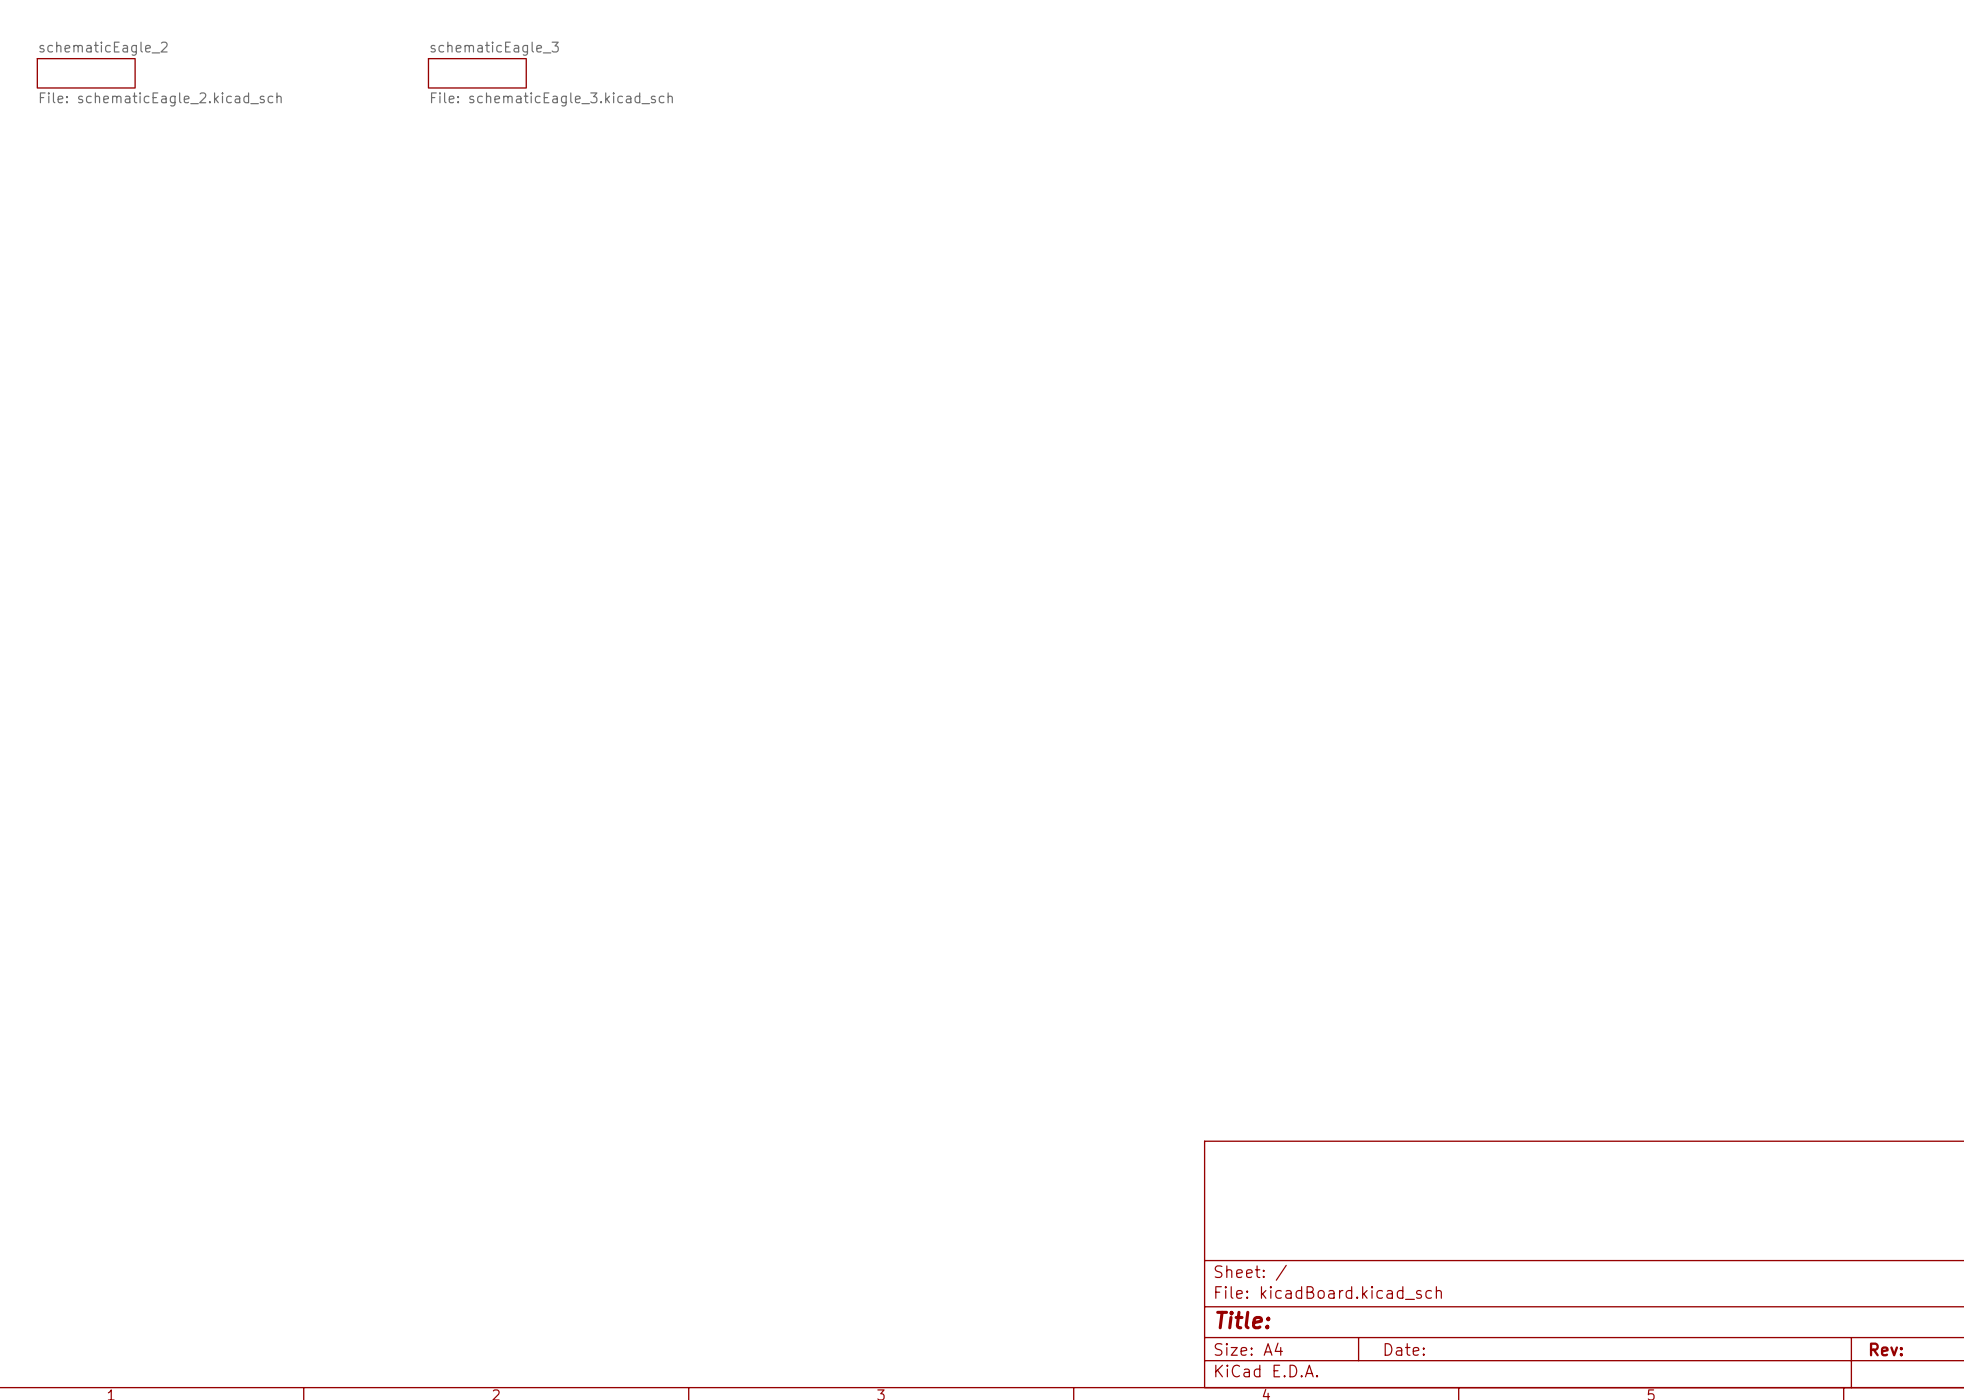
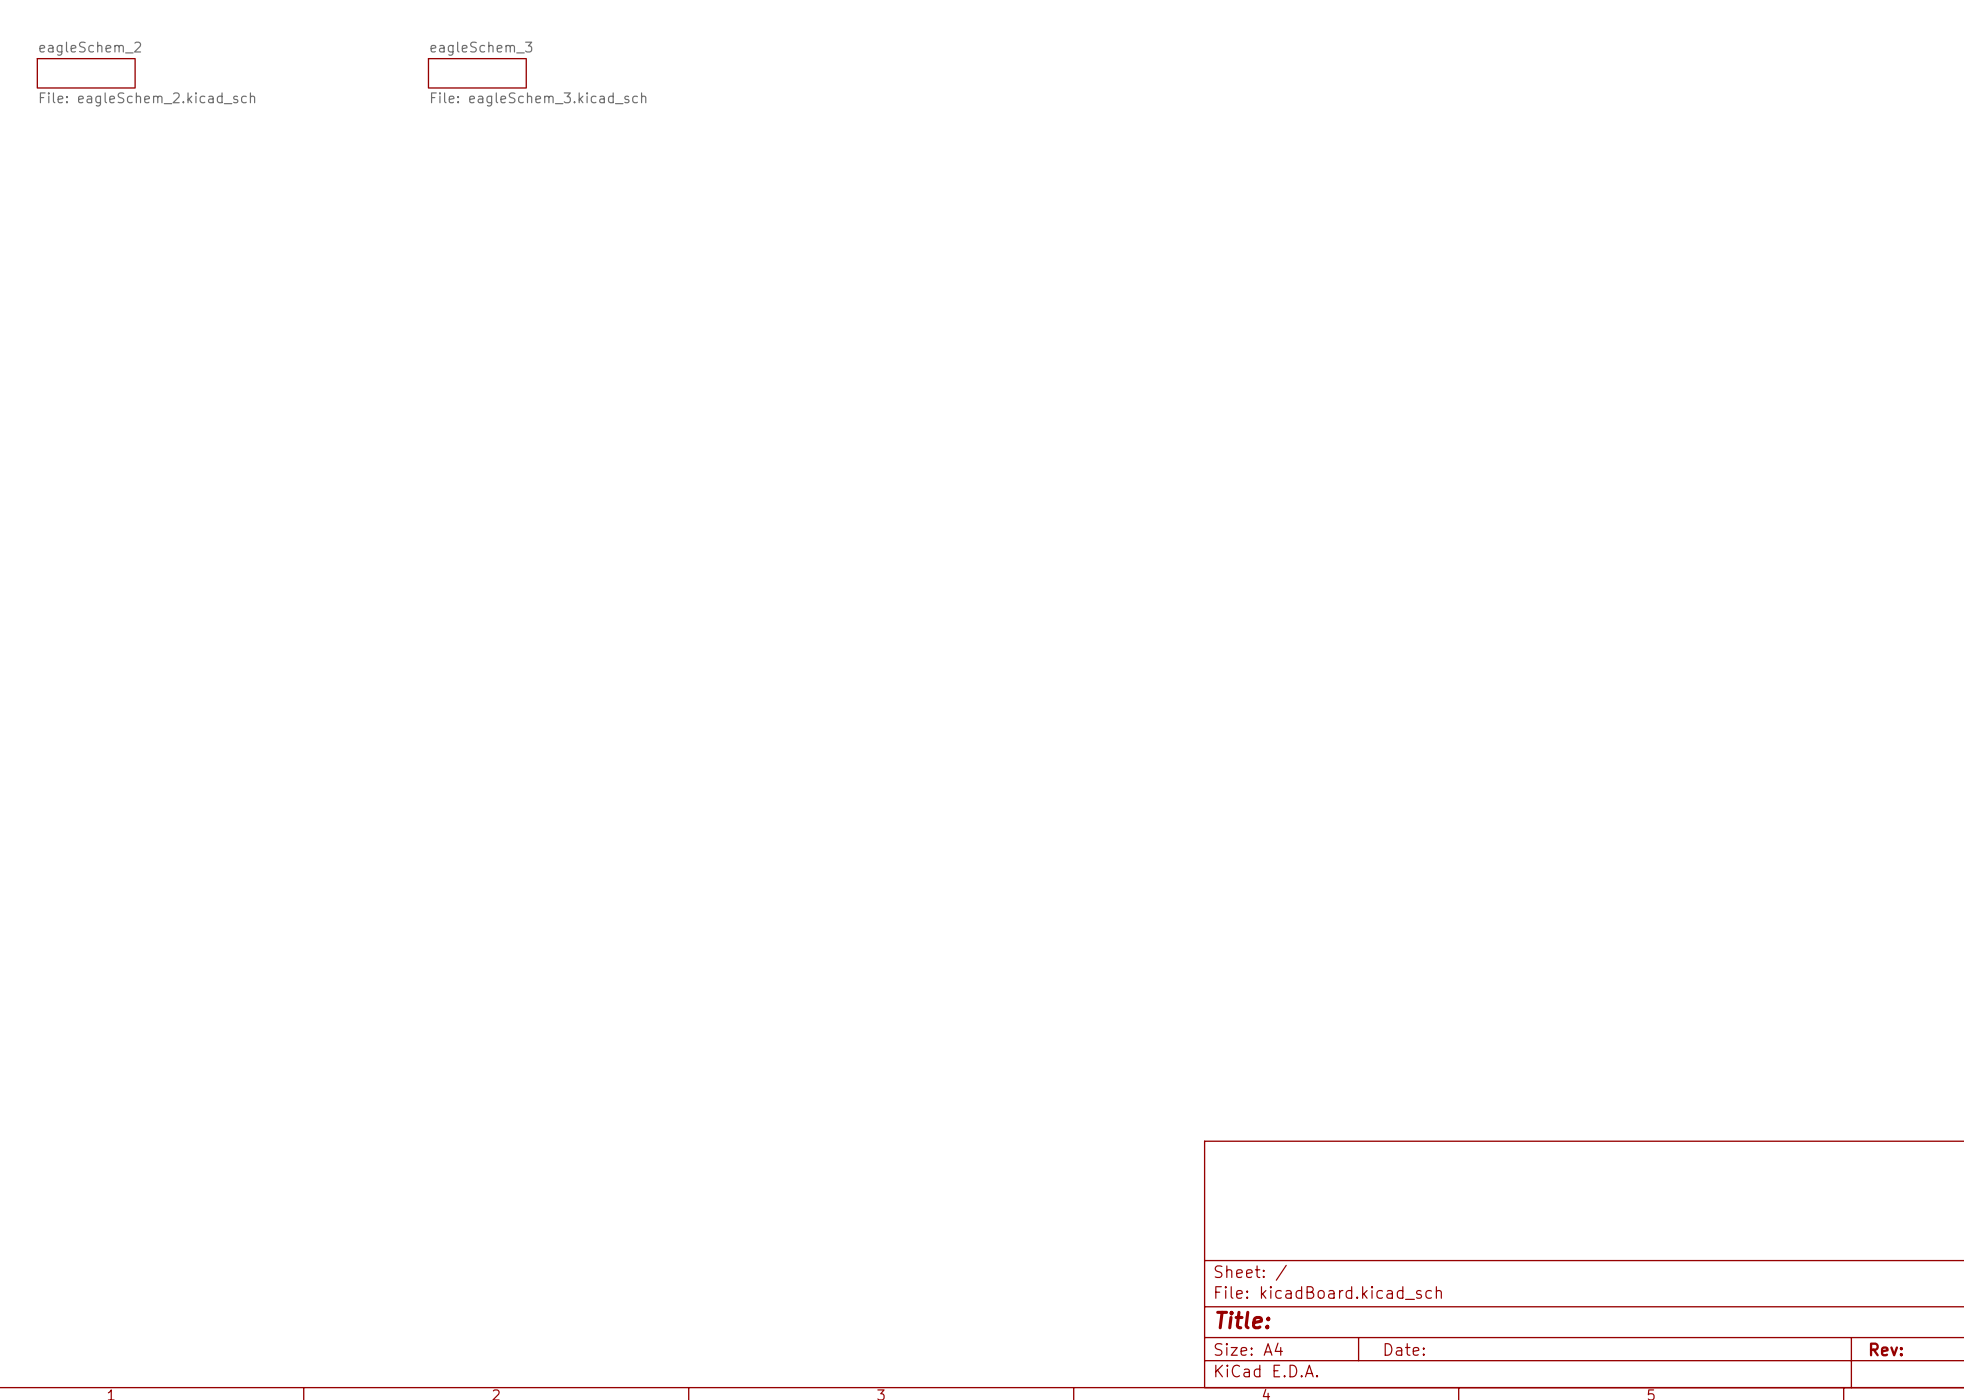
sheet schematicEagle_2 name: schematicEagle_2 (103, 48) -> eagleSchem_2 (90, 48)
sheet schematicEagle_3 name: schematicEagle_3 (494, 48) -> eagleSchem_3 (481, 48)
sheet schematicEagle_2 value: File: schematicEagle_2.kicad_sch (160, 99) -> File: eagleSchem_2.kicad_sch (147, 99)
sheet schematicEagle_3 value: File: schematicEagle_3.kicad_sch (551, 99) -> File: eagleSchem_3.kicad_sch (538, 99)

